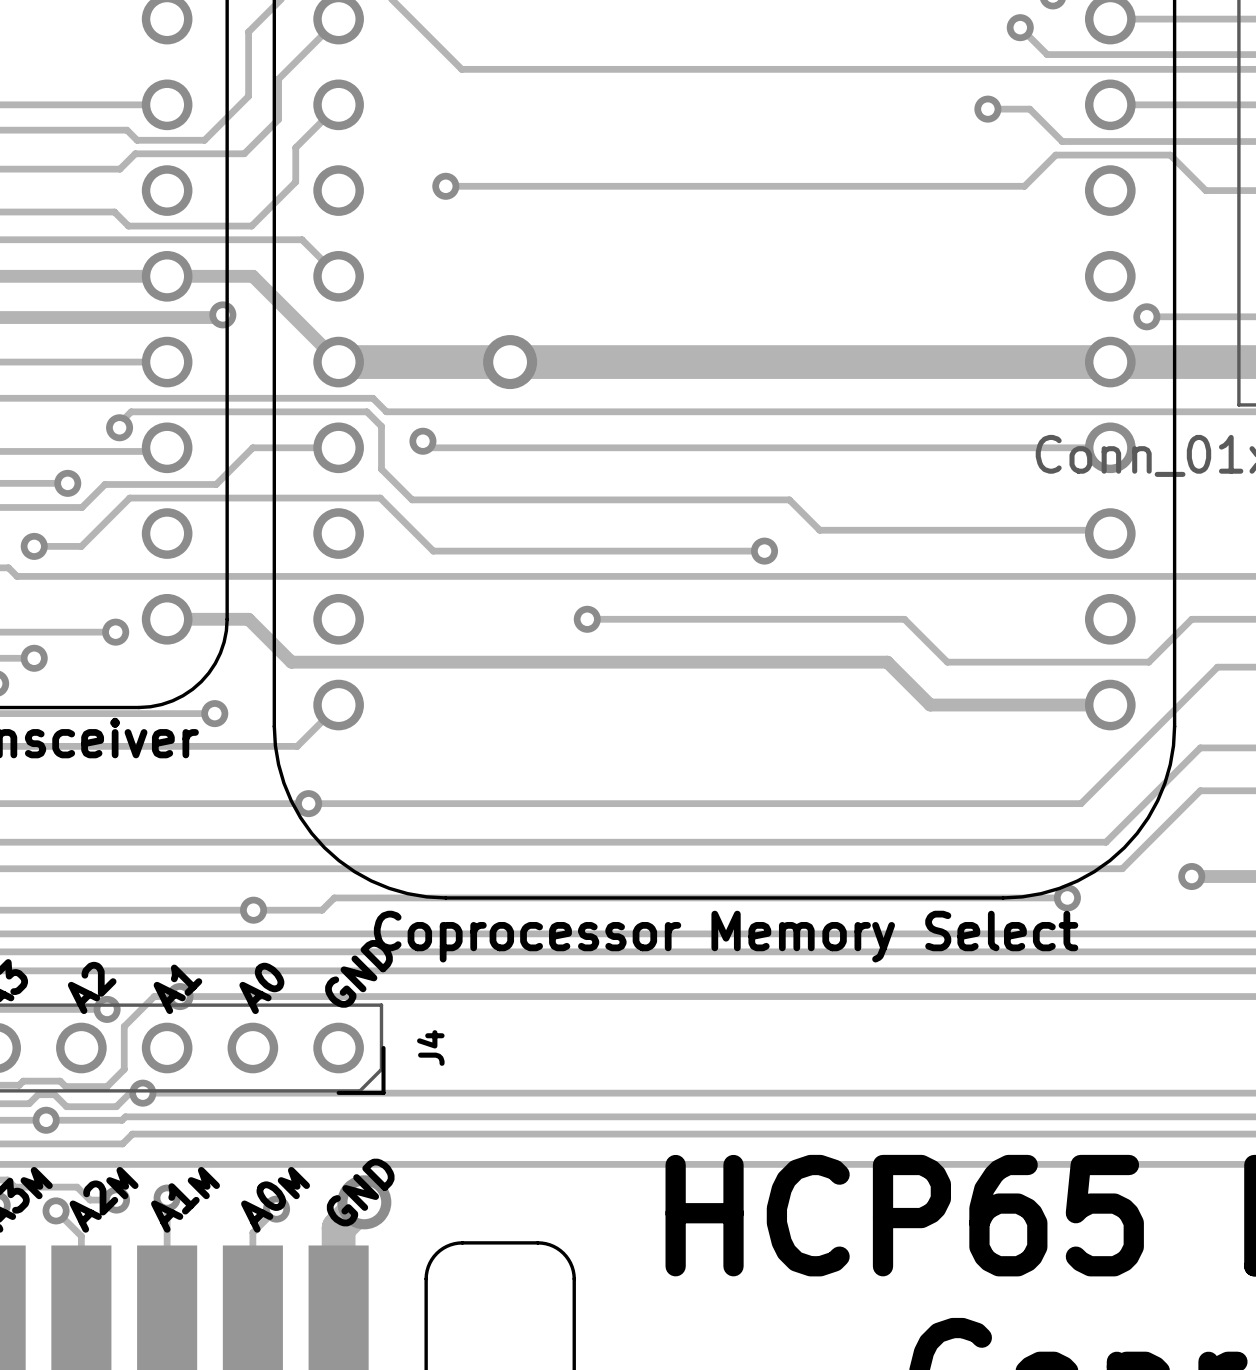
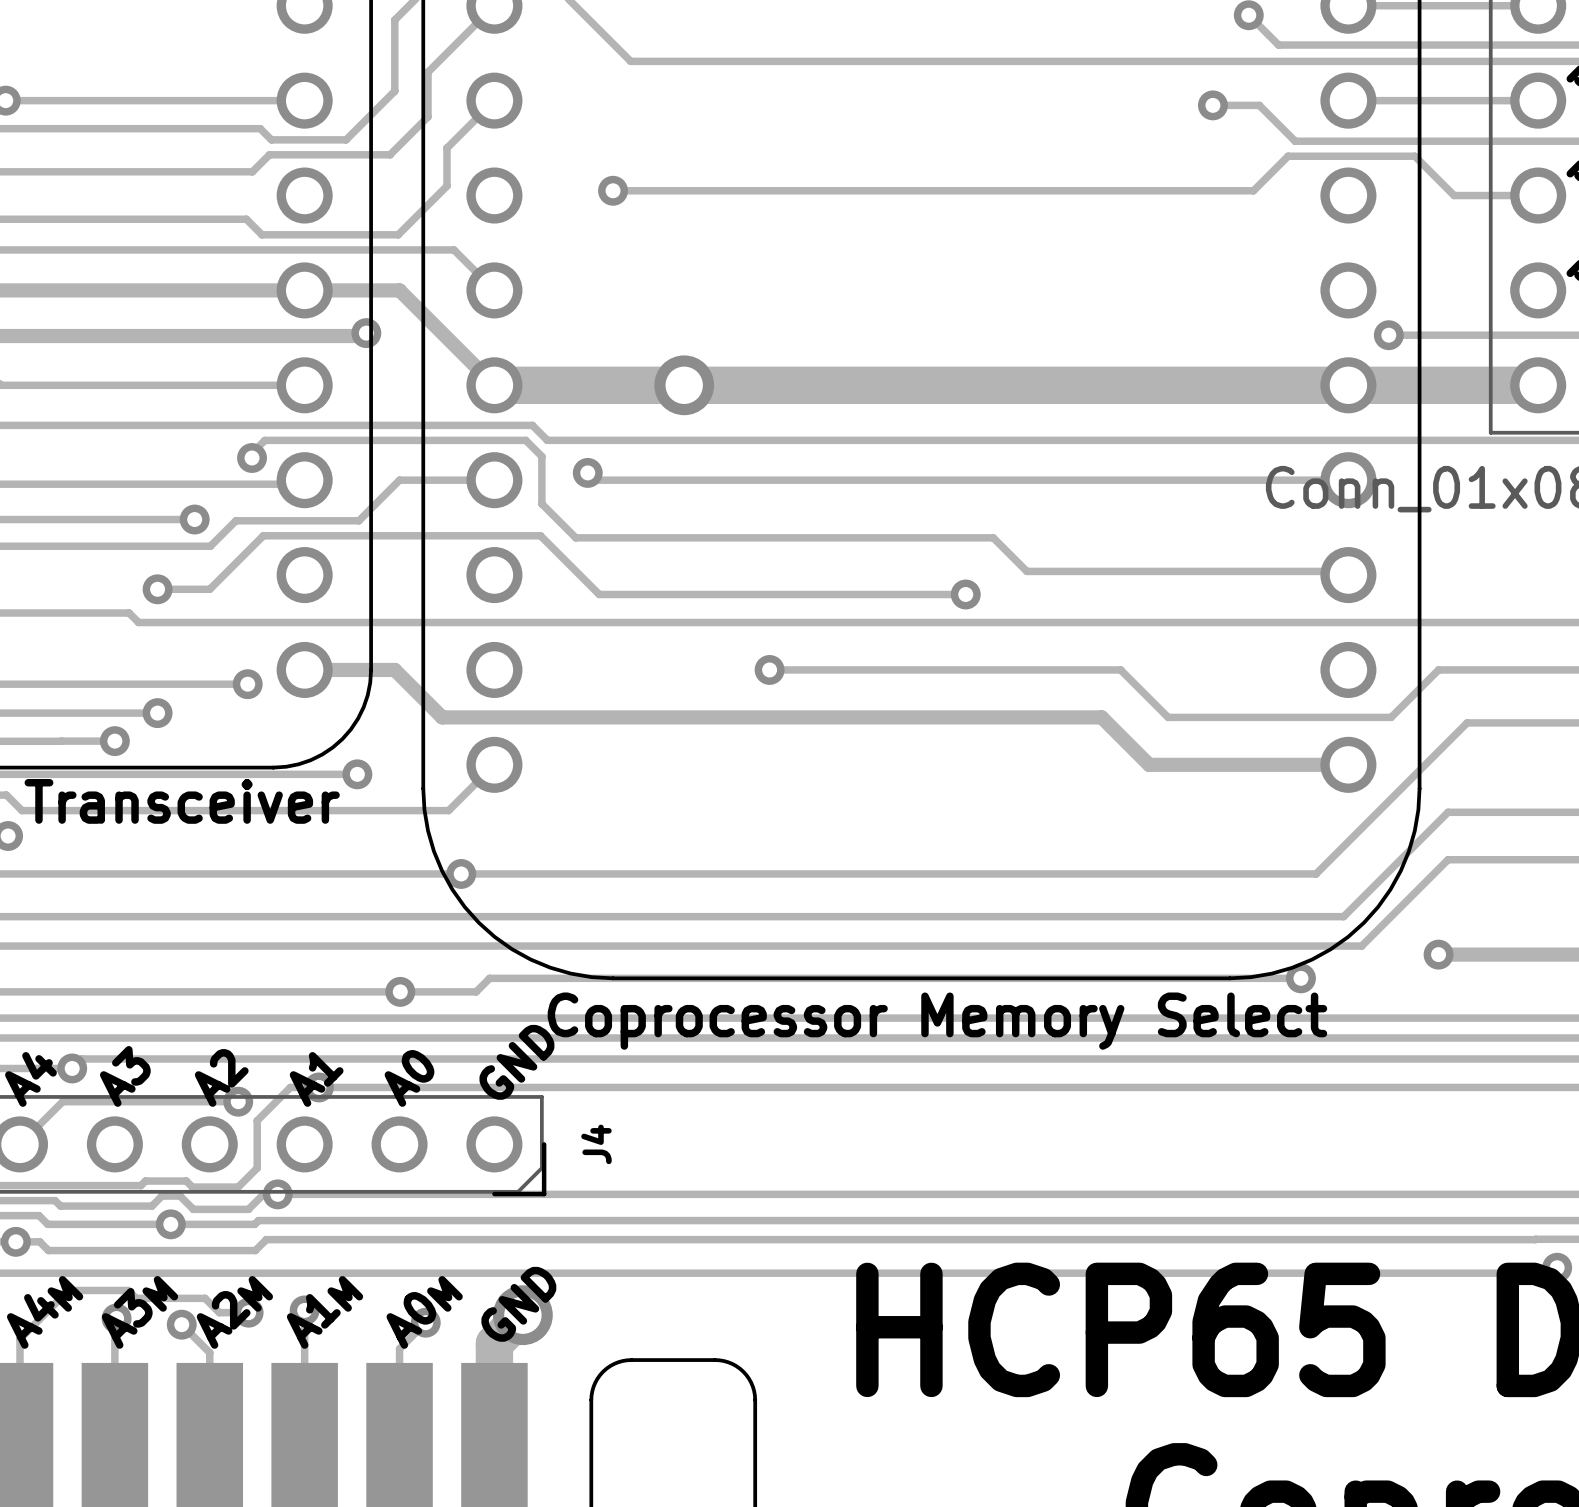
part text position: Coprocessor Memory Select (726, 936) -> Coprocessor Memory Select (937, 1021)

